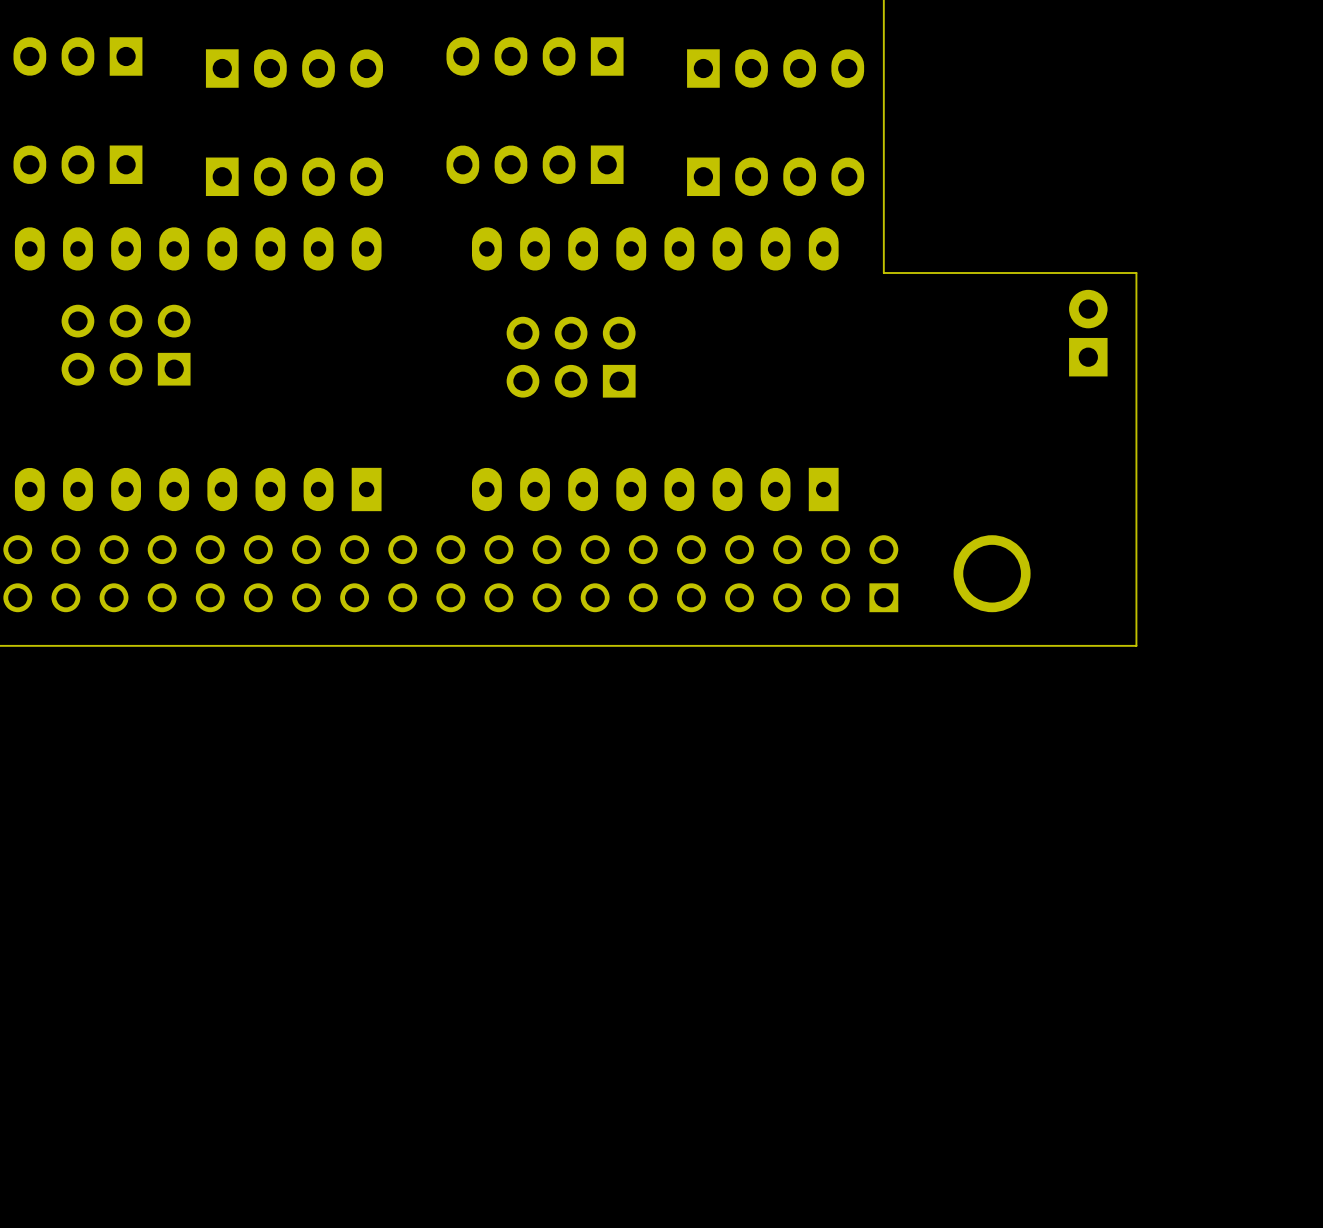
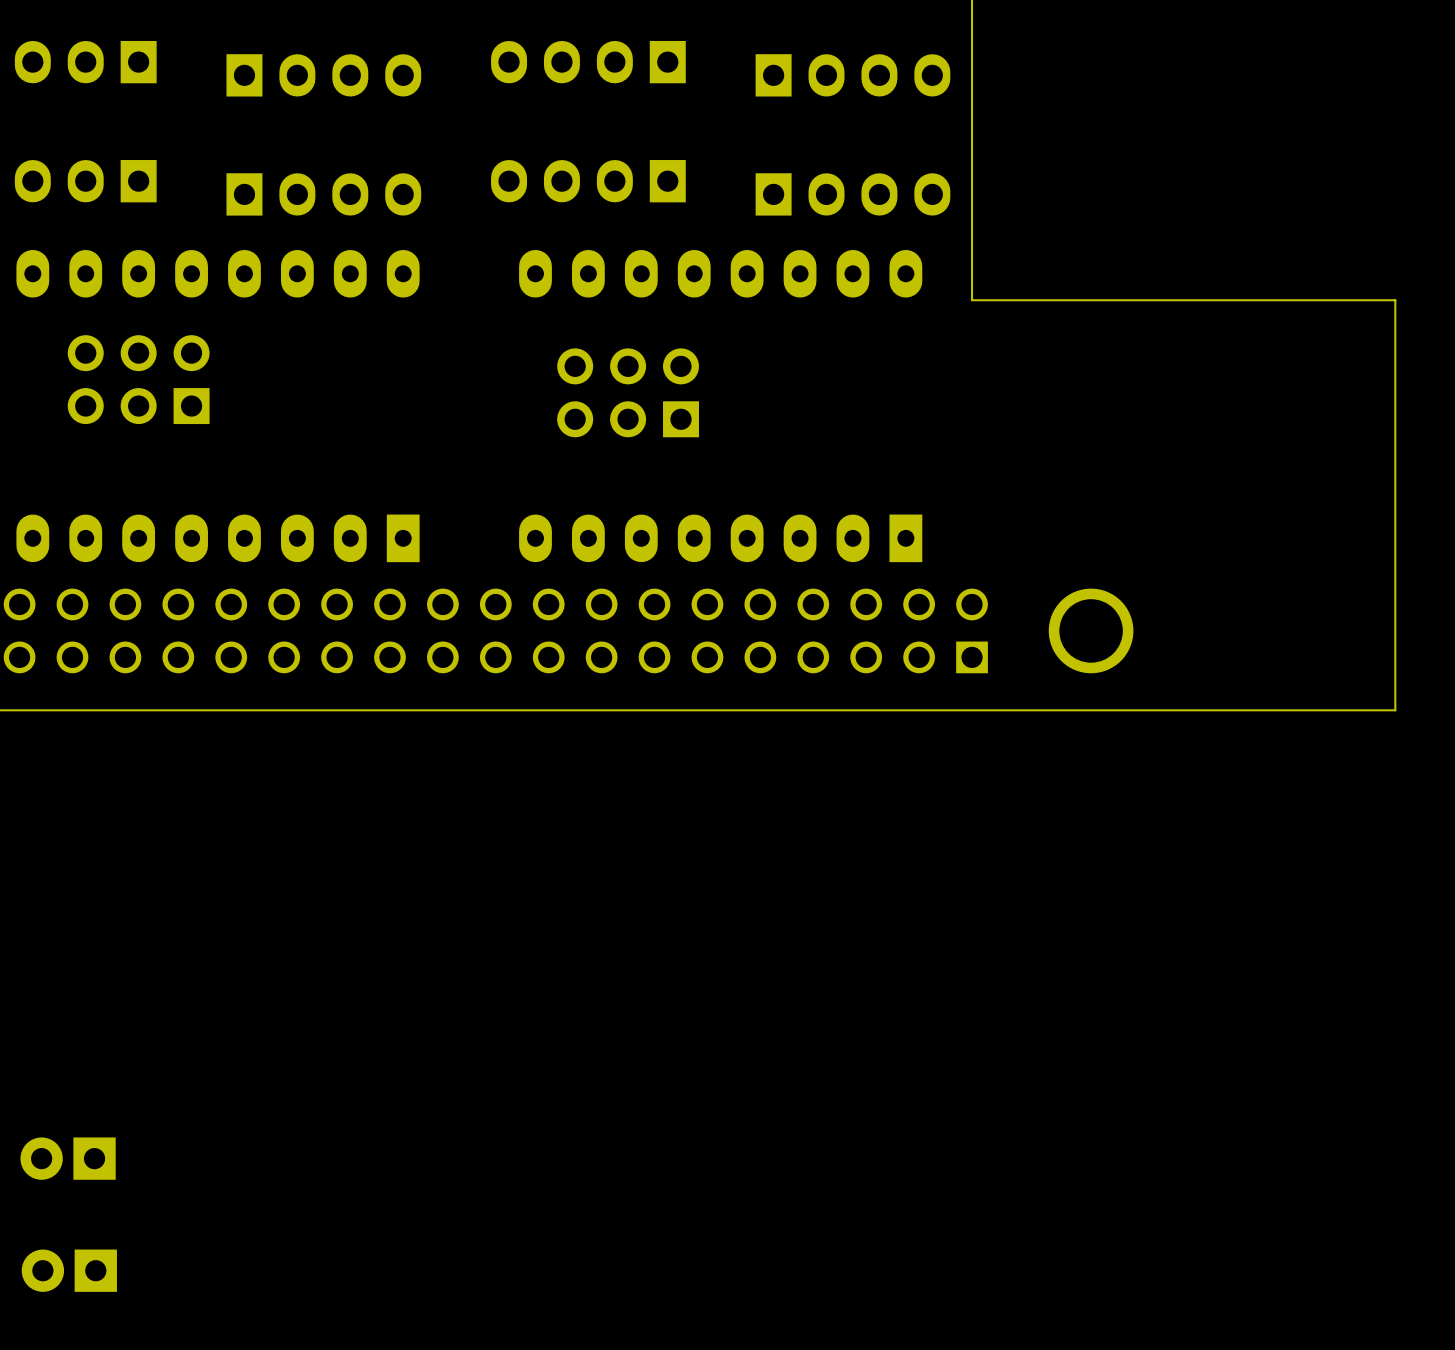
board edge: (1136, 273) (1136, 645) -> (1249, 300) (1395, 300) (1395, 710) (1249, 710)
part: (1088, 333) -> none
part: none -> (68, 1158)
part: none -> (69, 1270)

